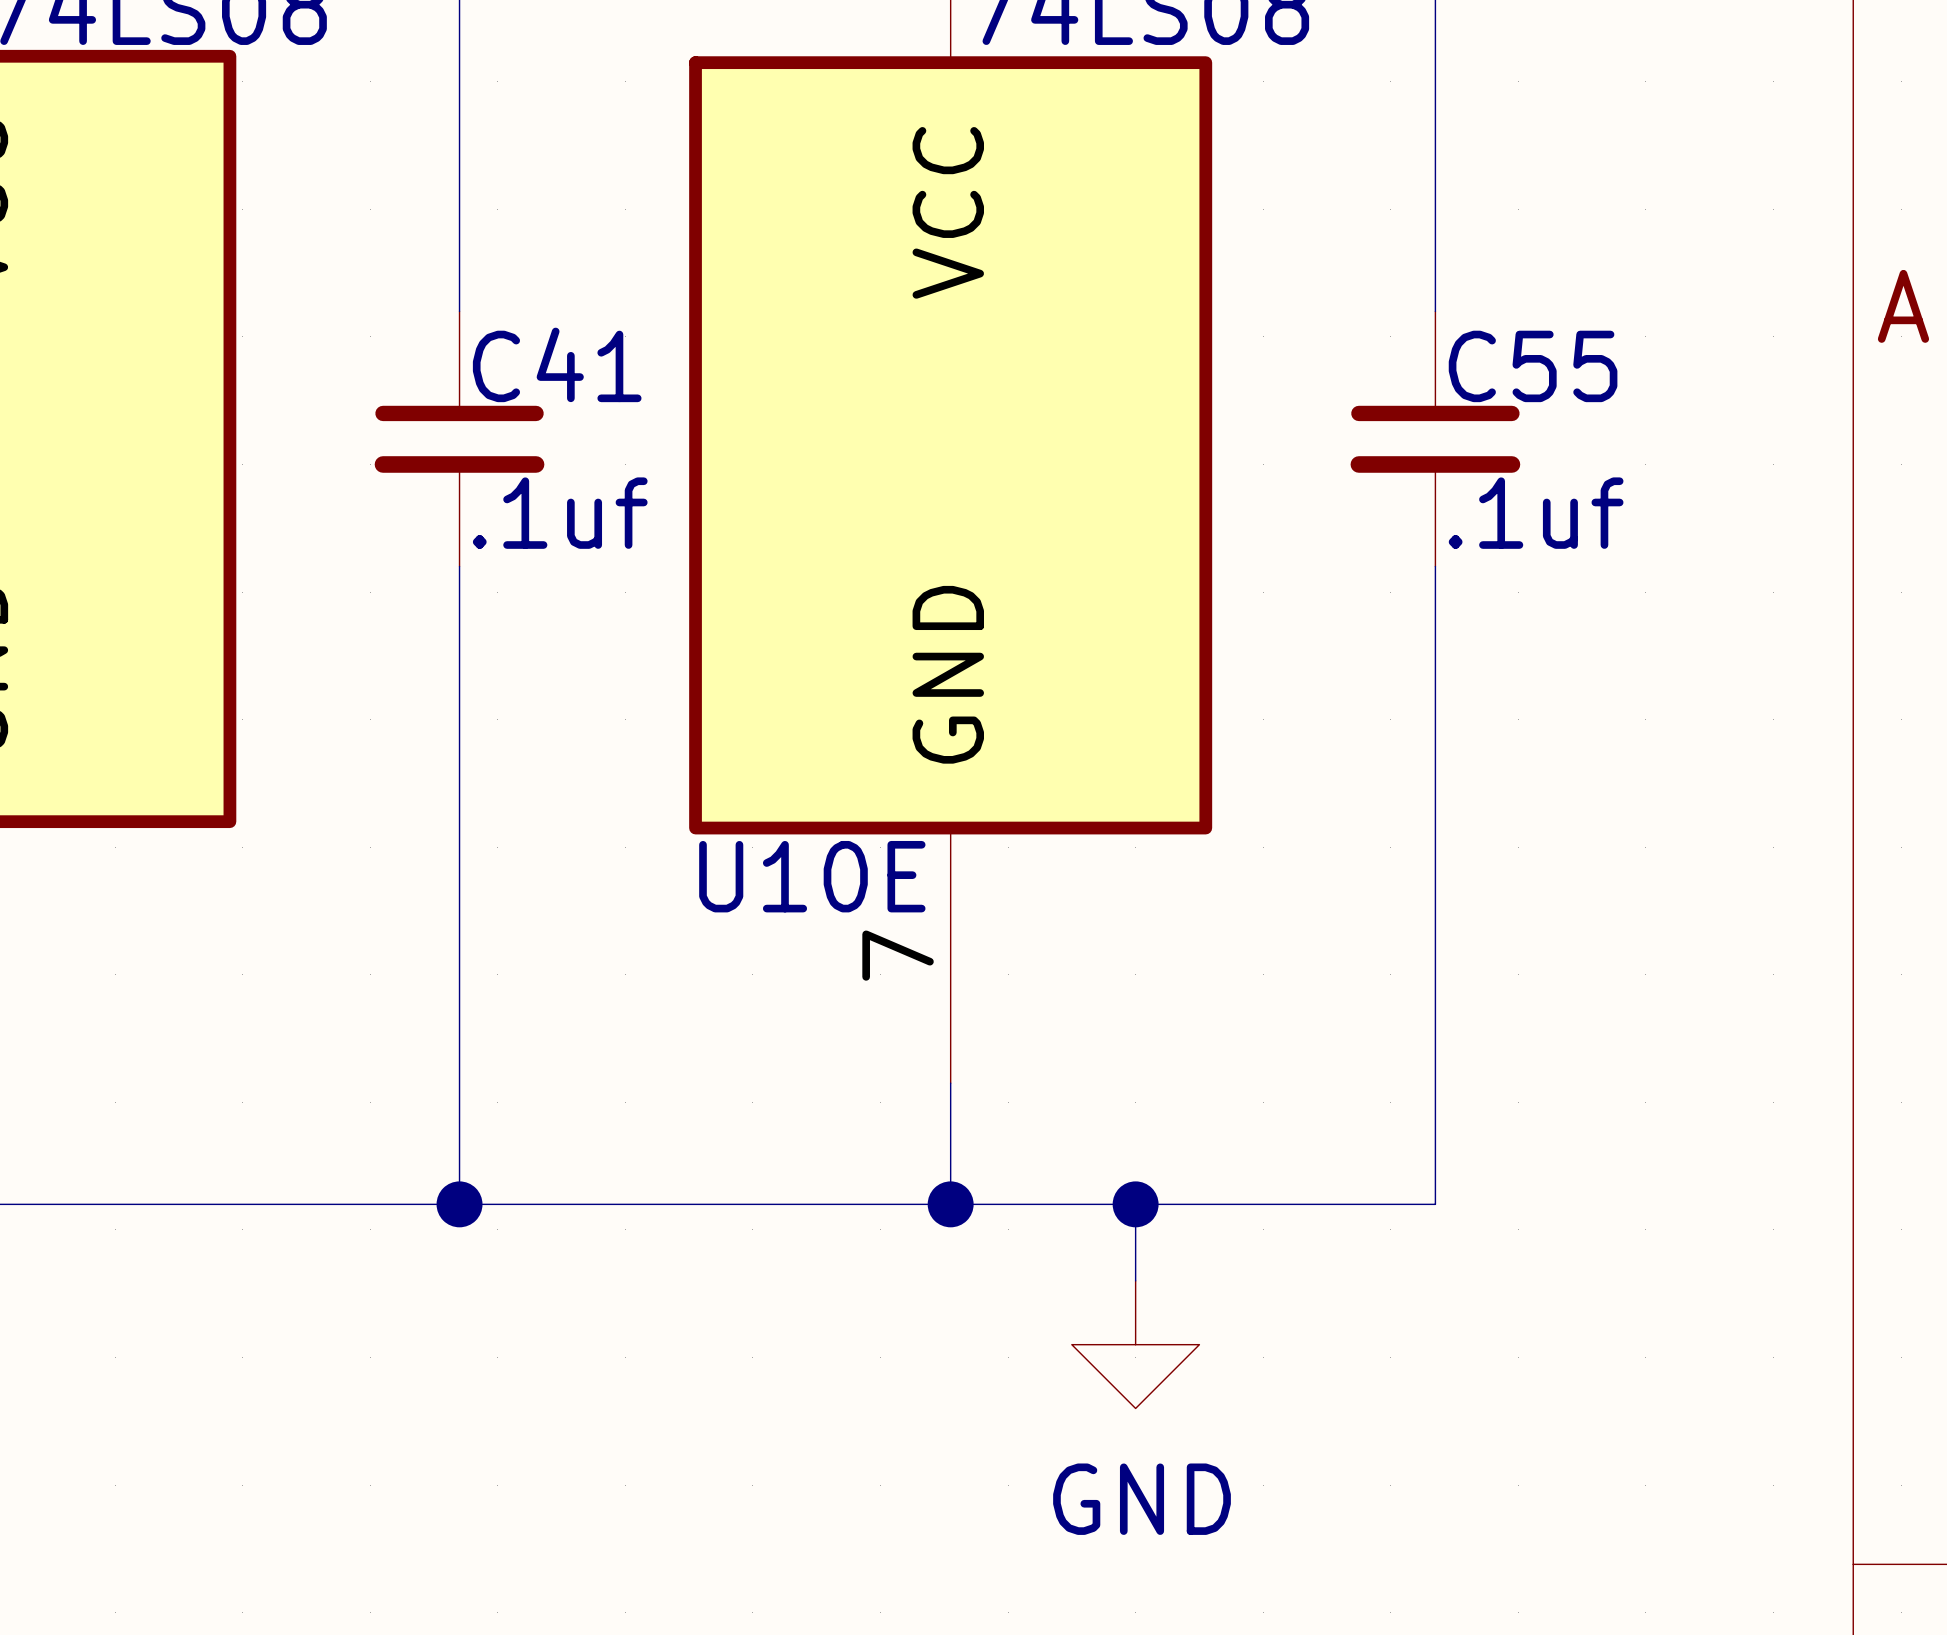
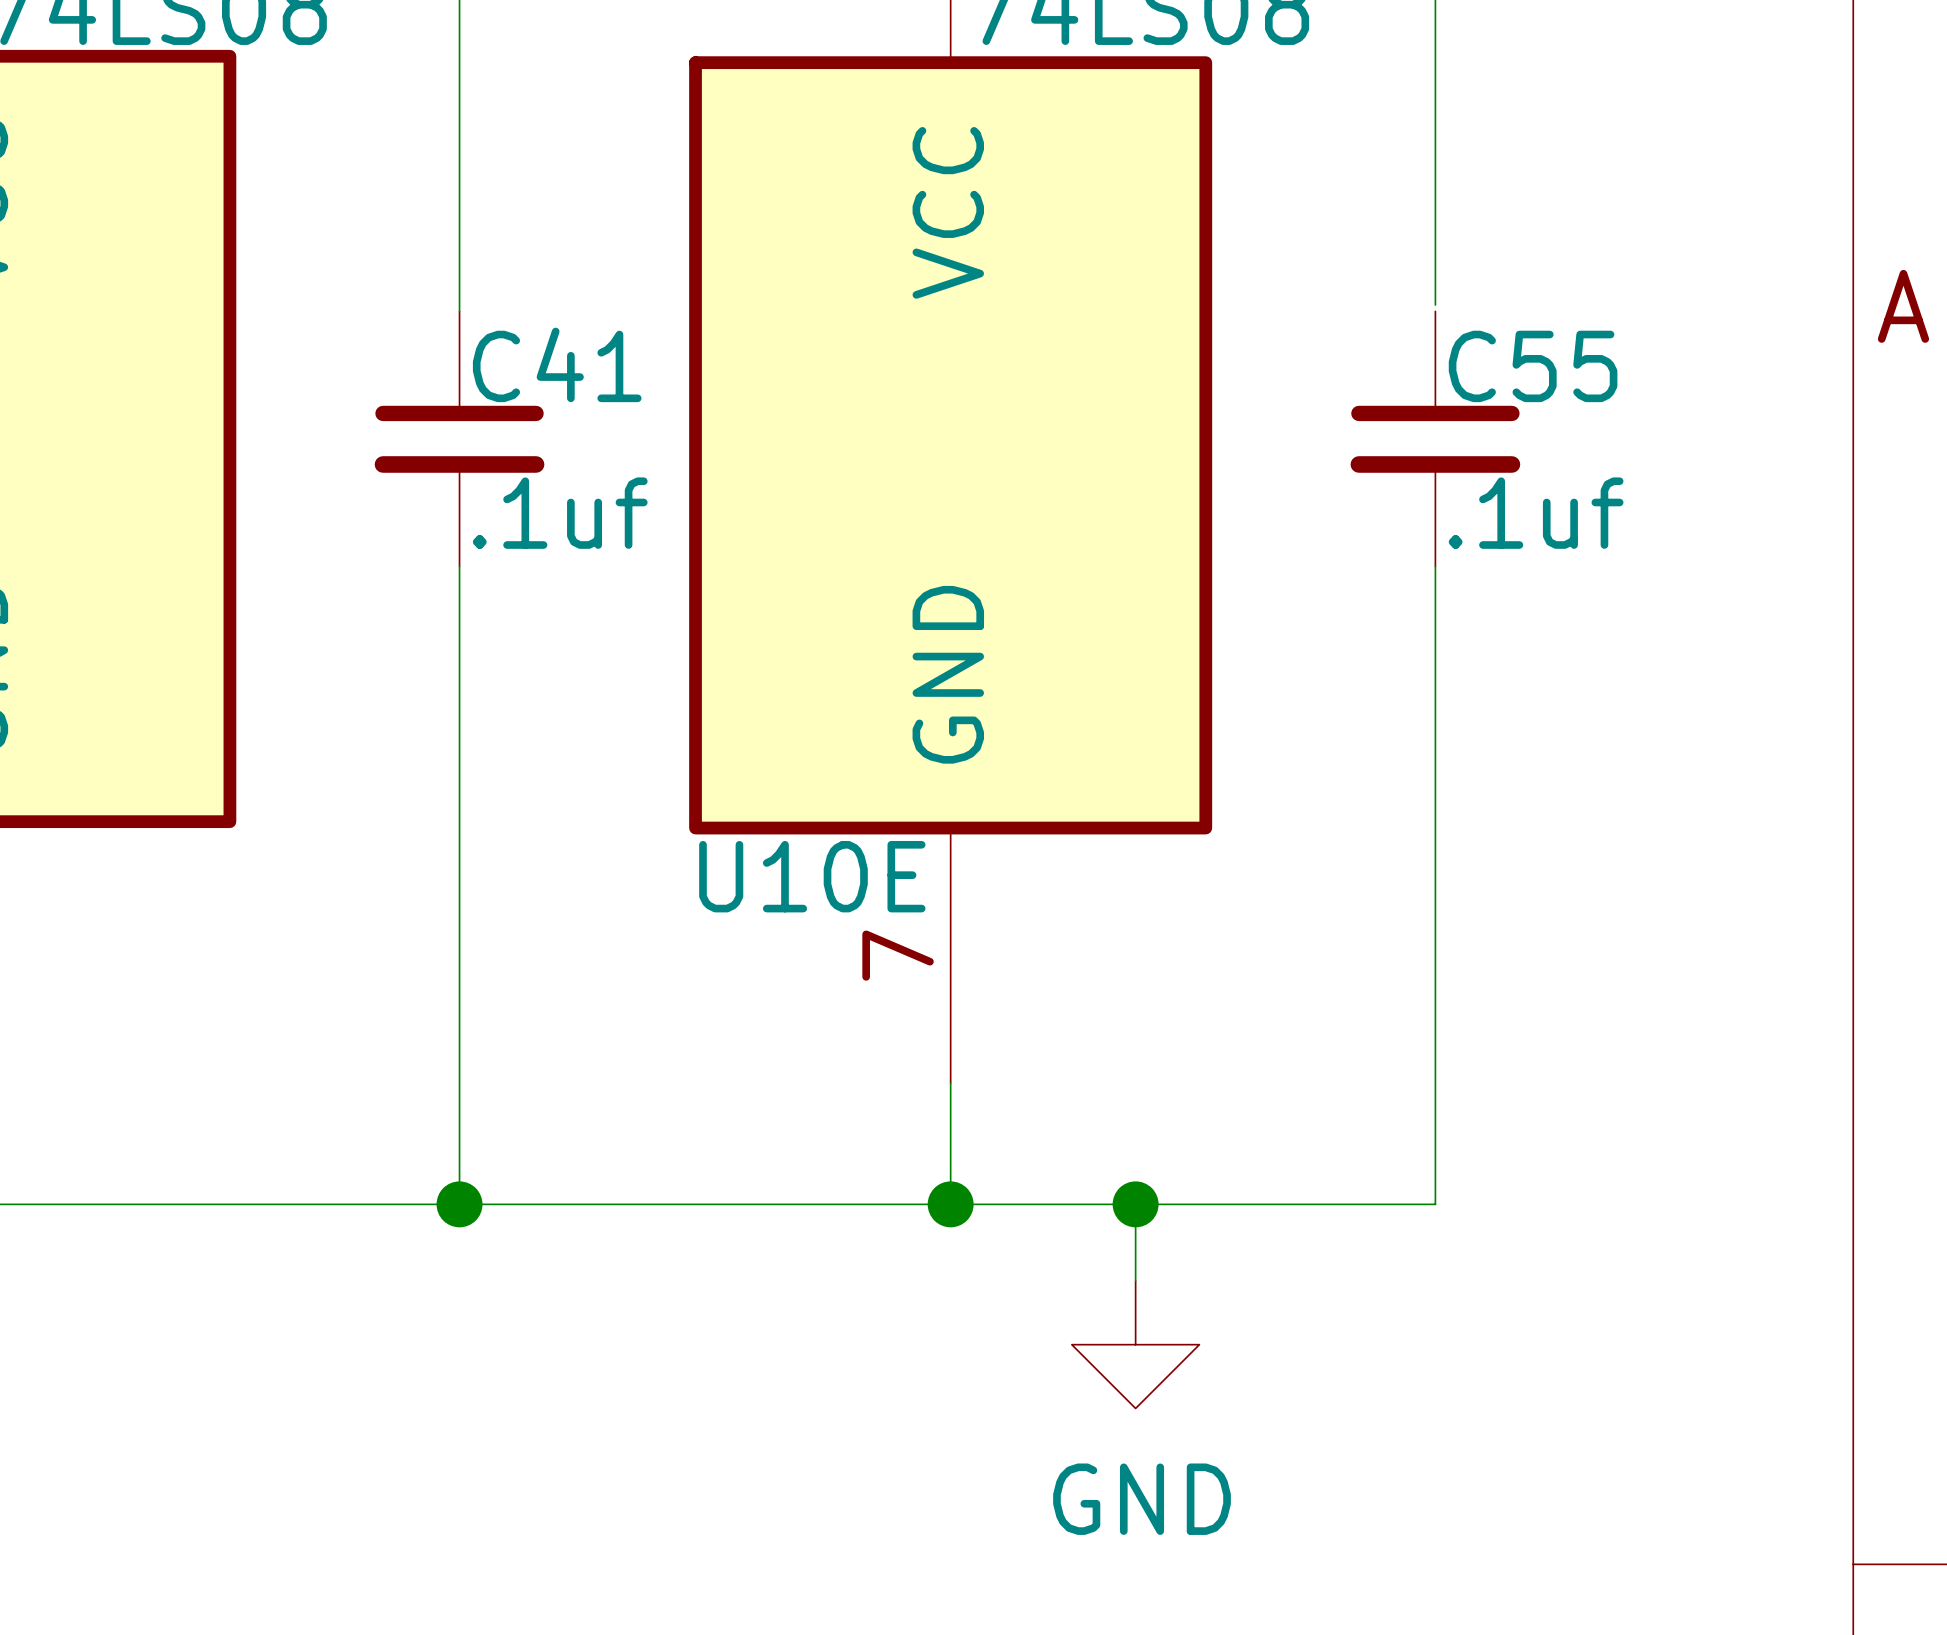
wire: (1435, 305) (1435, 311) -> none

